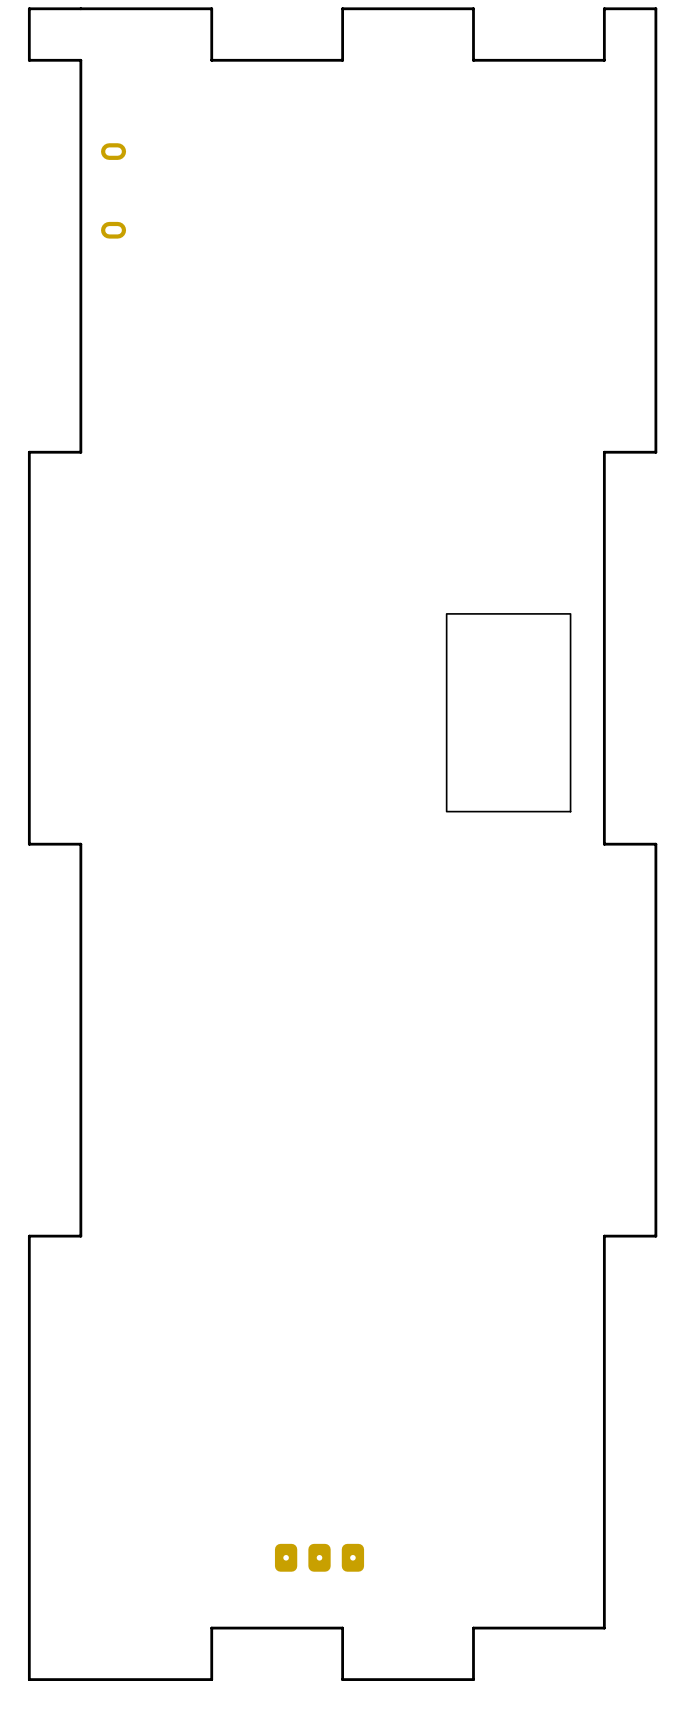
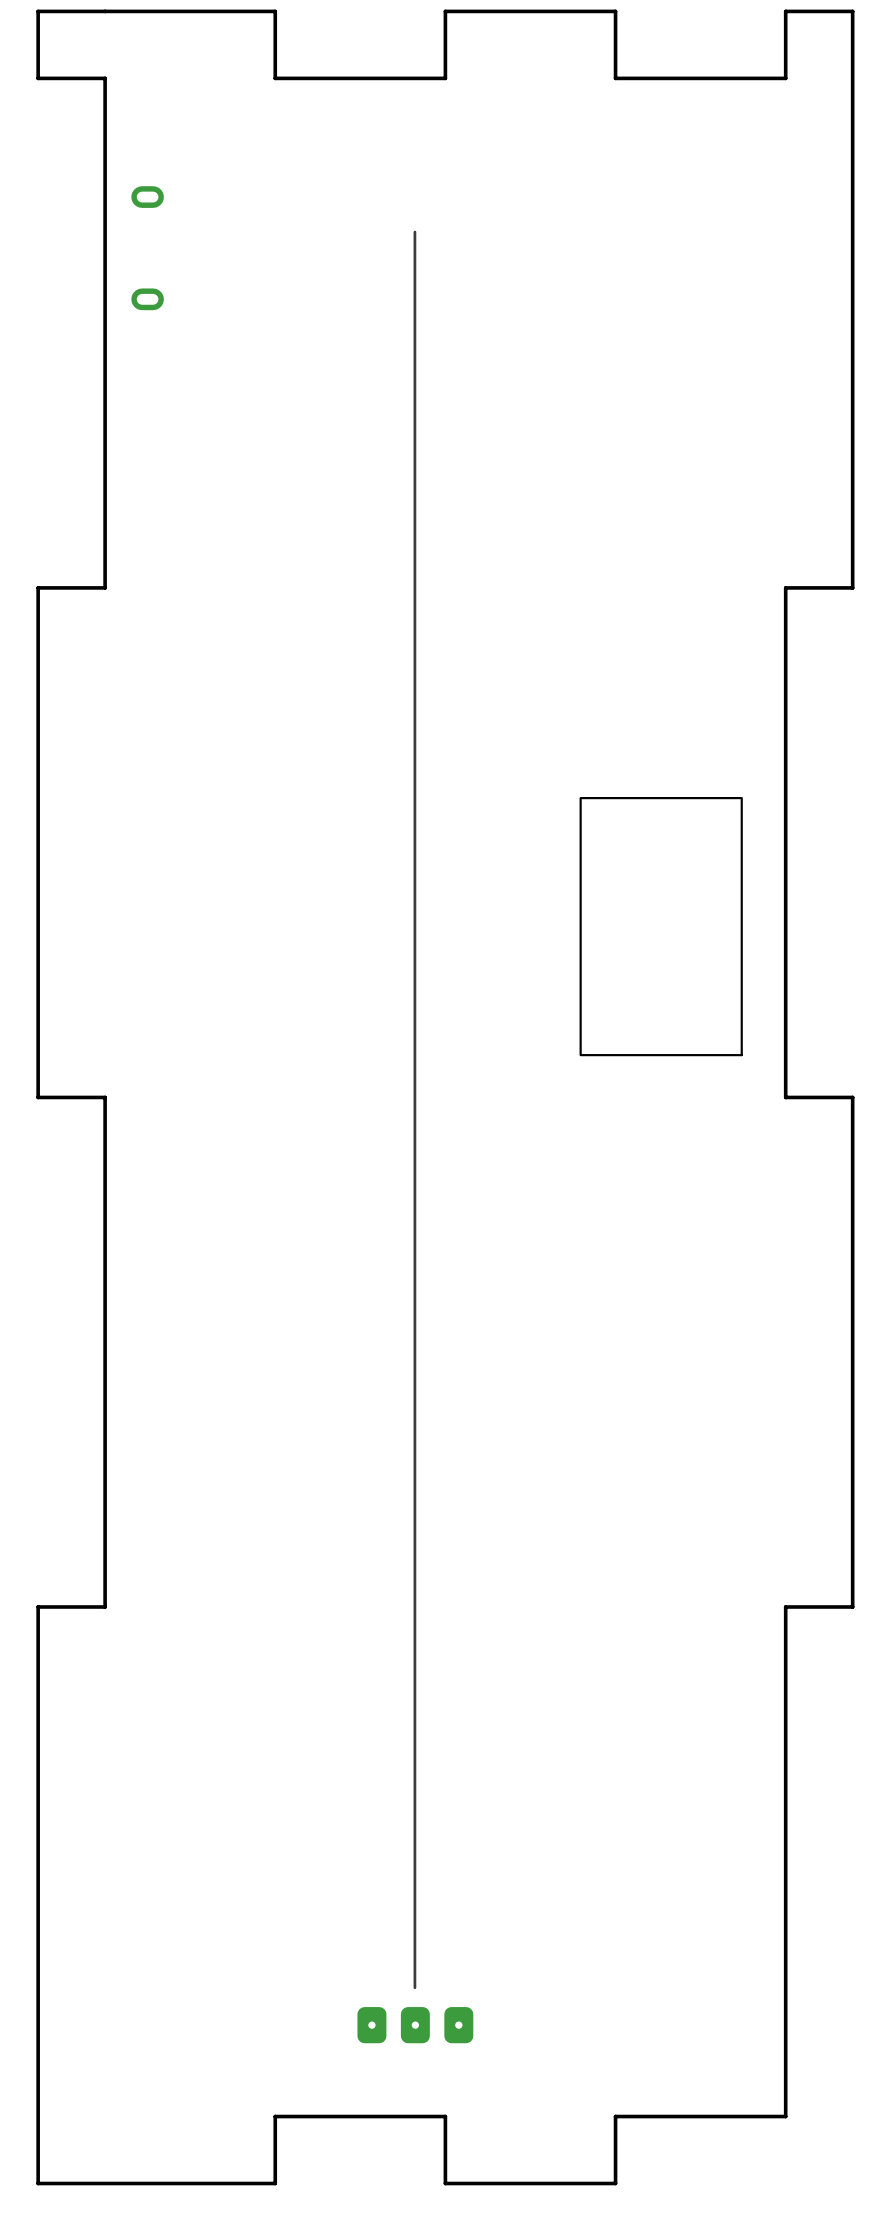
line: none -> (414, 231) (414, 1987)

